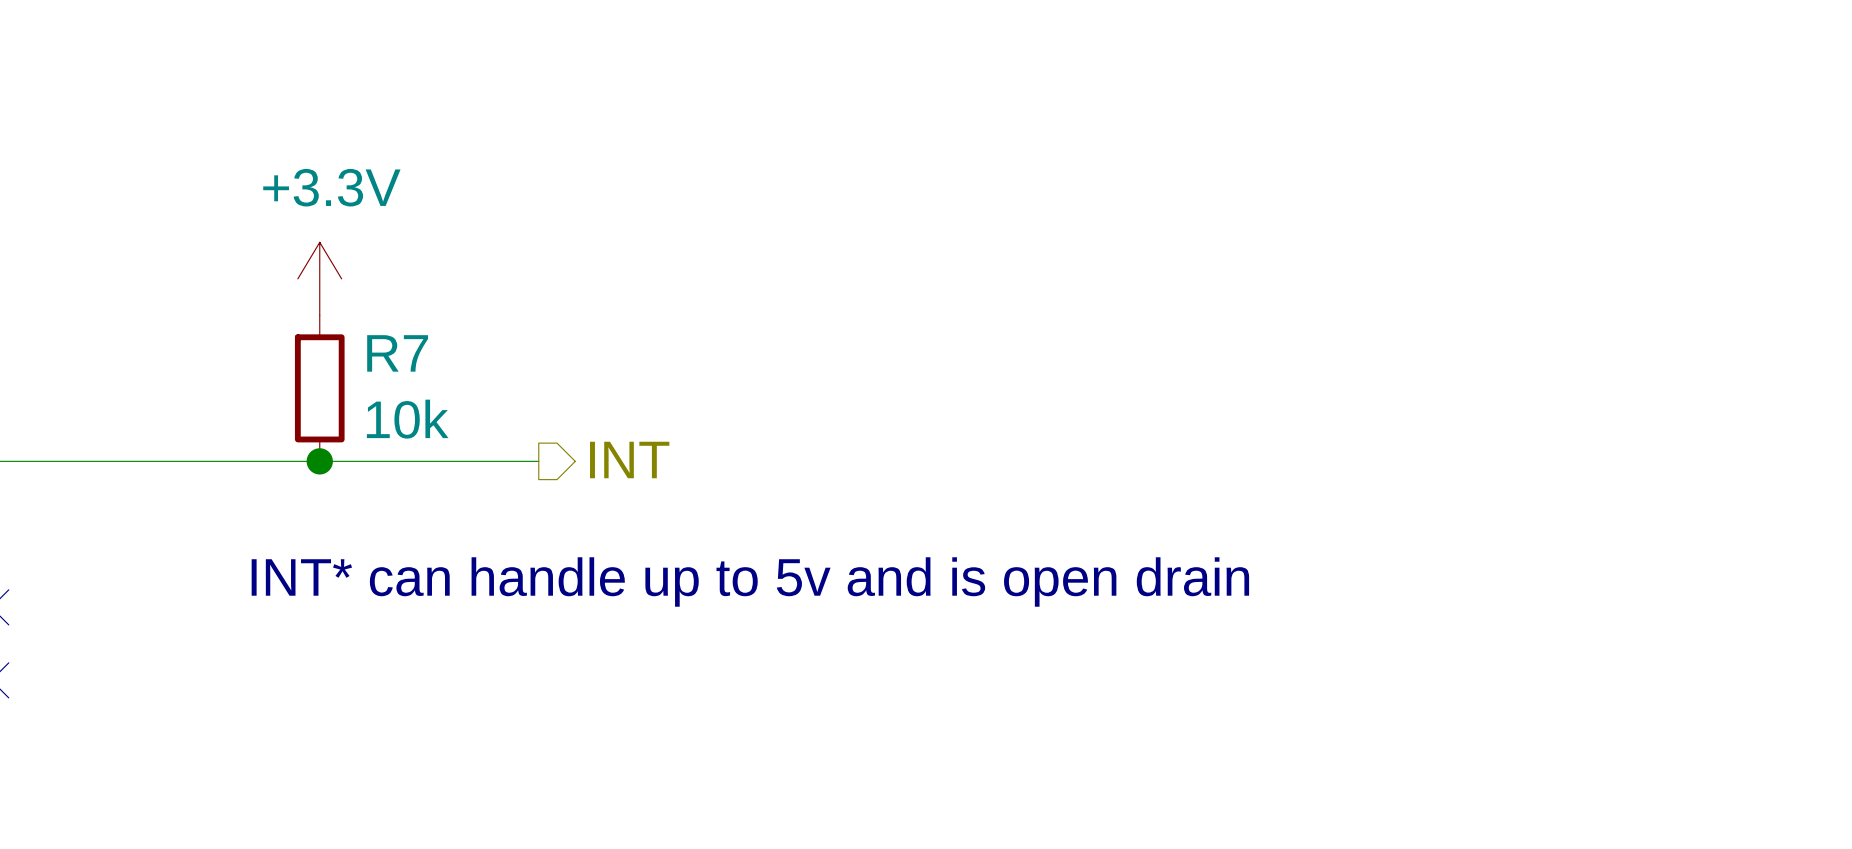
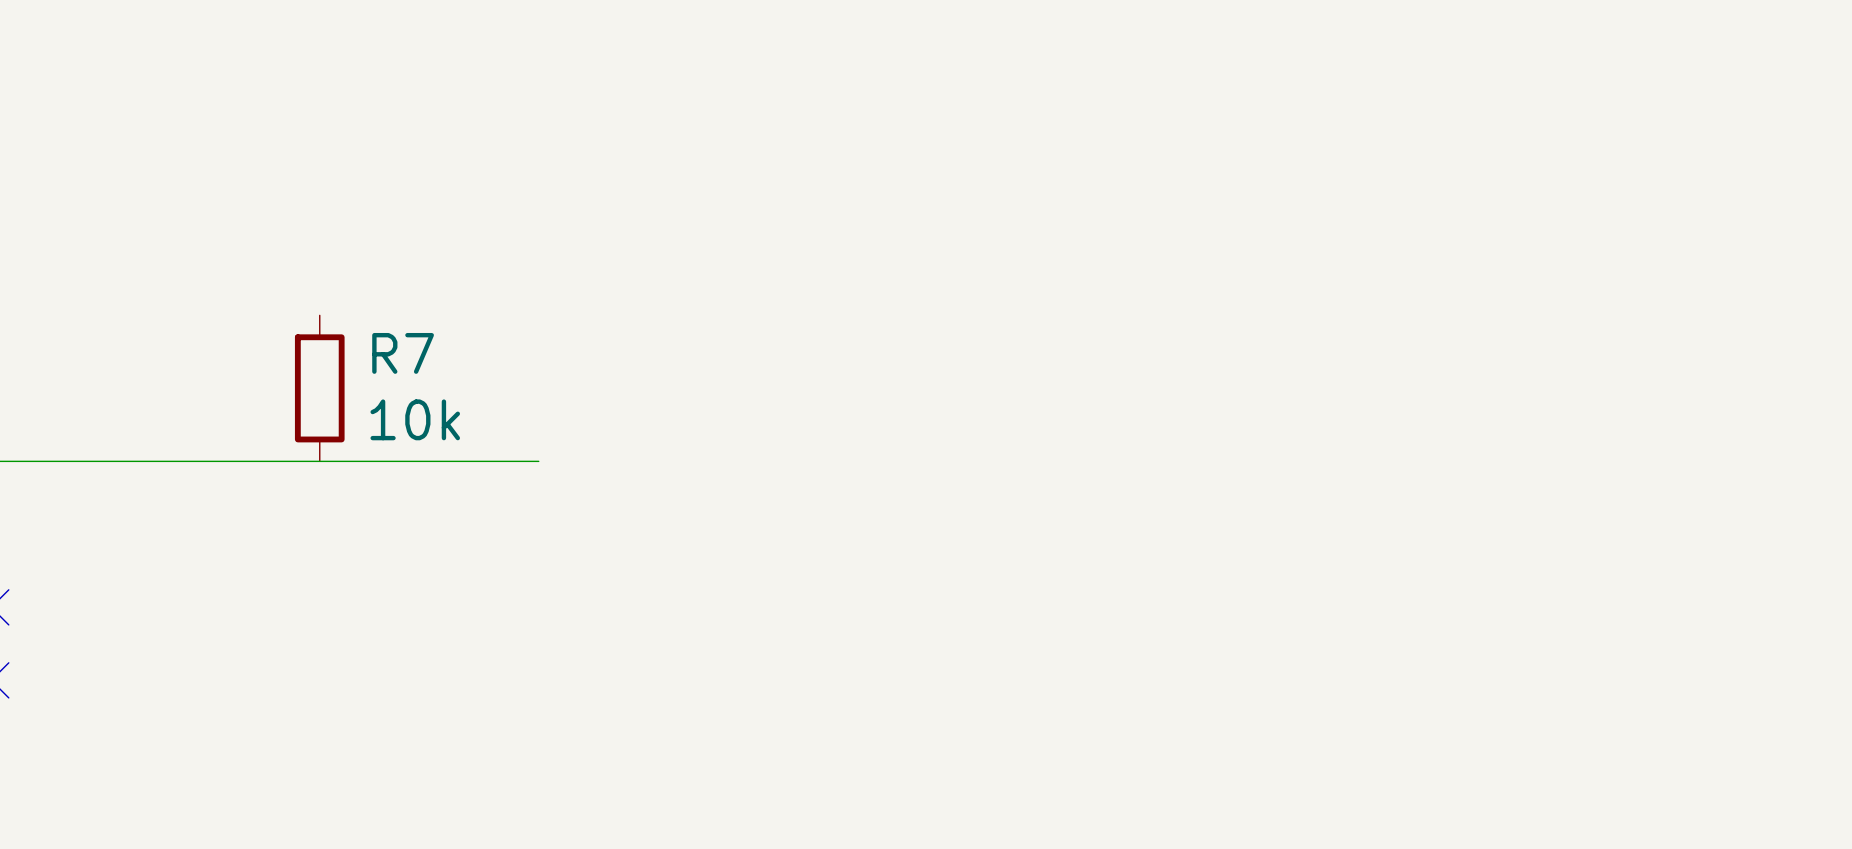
power symbol: +3.3V (319, 278) -> none
hierarchical label: INT (629, 460) -> none
junction: (319, 461) -> none
text: INT* can handle up to 5v and is open drain (750, 581) -> none

